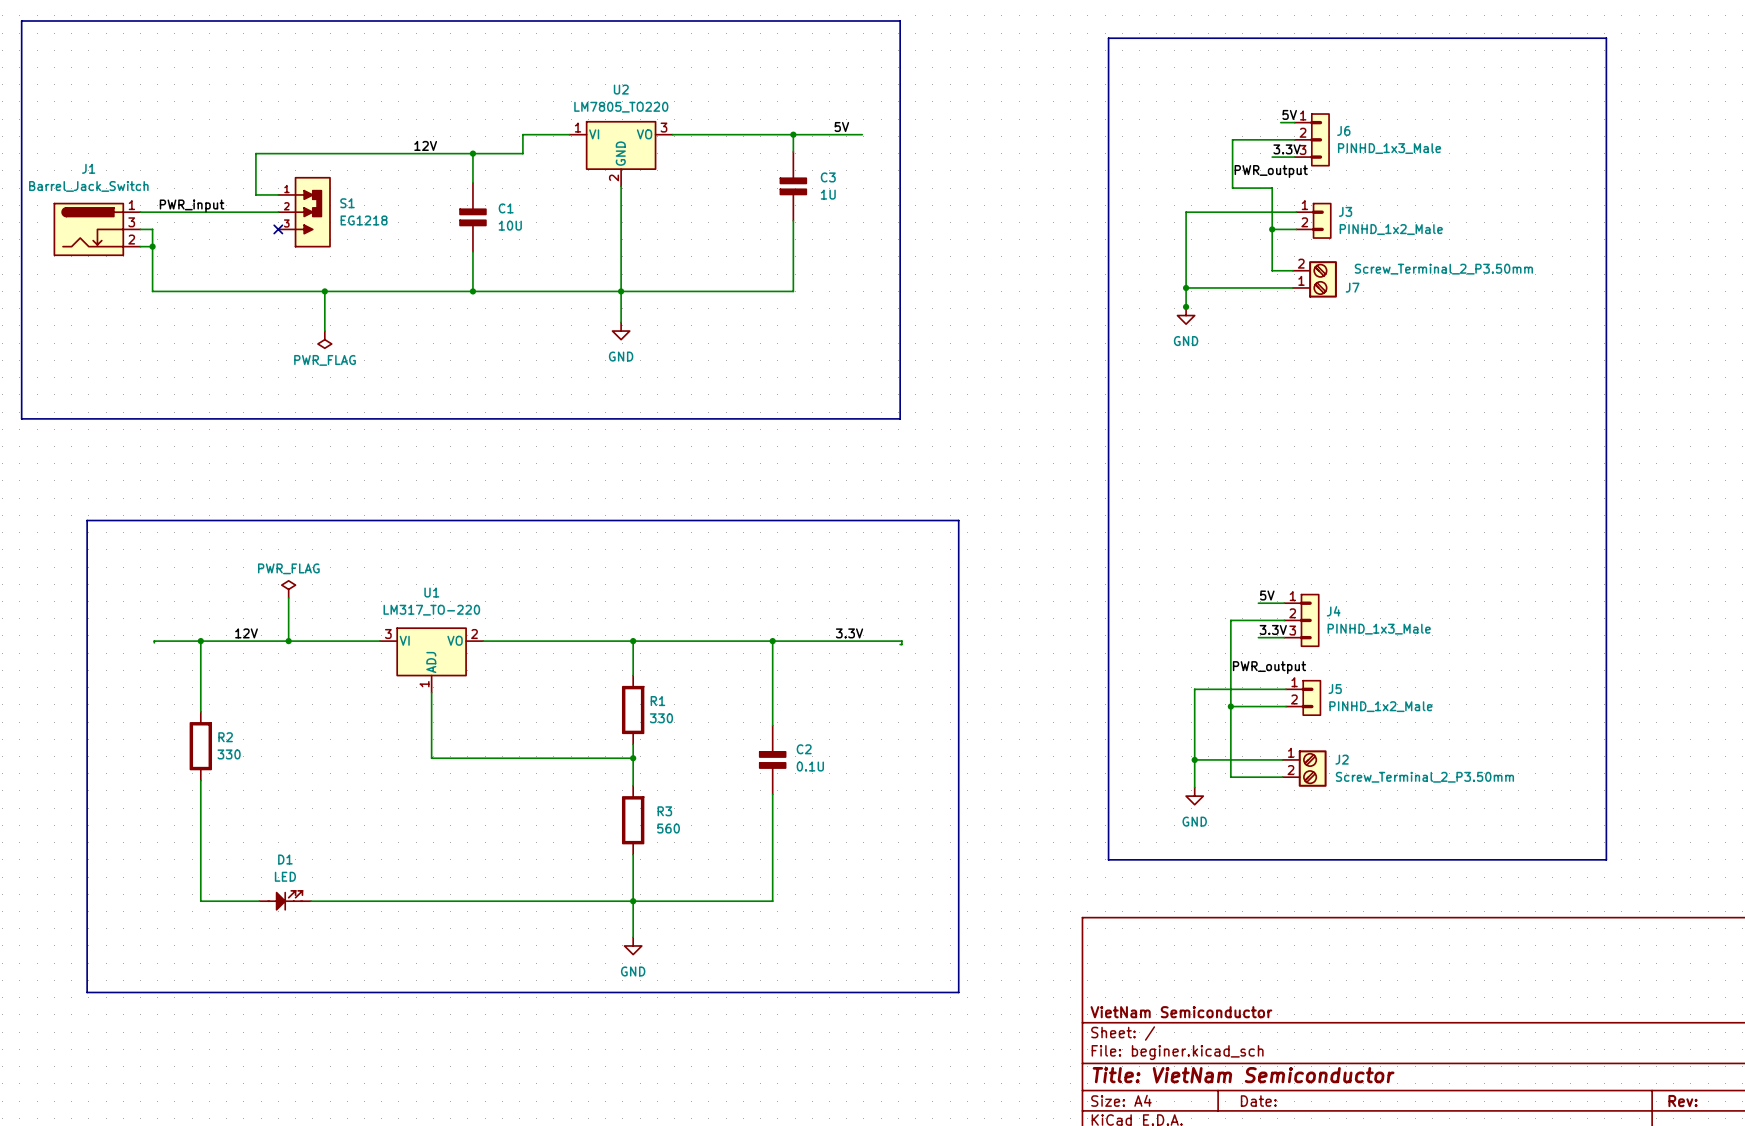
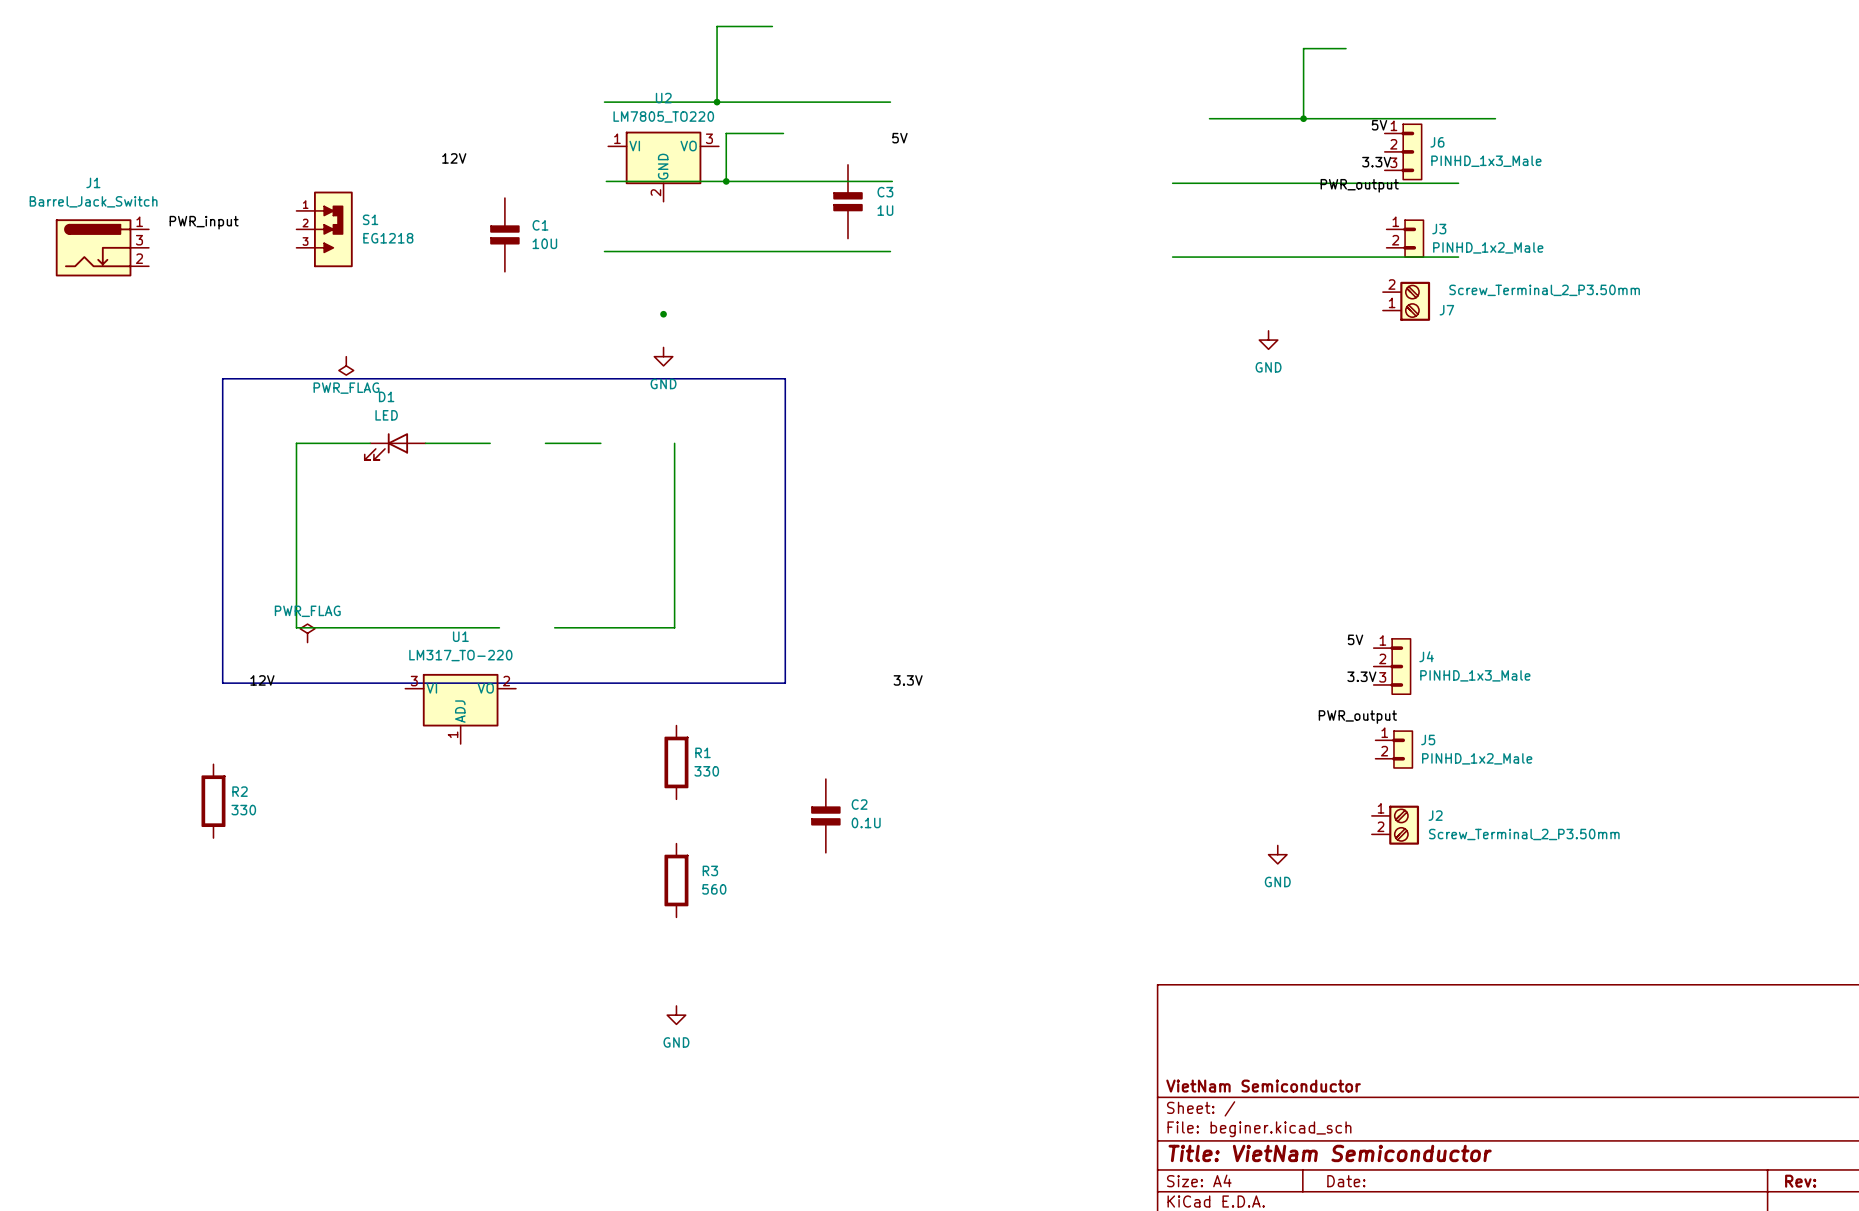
line: (21, 20) (900, 20) (900, 418) (21, 418) (21, 20) -> none
wire: none -> (772, 26) (717, 26) (717, 102)
line: (1108, 38) (1606, 38) (1606, 859) (1108, 859) (1108, 38) -> none
wire: none -> (1346, 48) (1303, 48) (1303, 118)
wire: none -> (604, 102) (890, 102)
junction: none -> (717, 102)
wire: none -> (1209, 118) (1495, 118)
junction: none -> (1303, 118)
wire: none -> (783, 133) (726, 133) (726, 181)
wire: (1280, 122) (1294, 122) -> none
wire: (569, 134) (522, 134) (522, 153) (255, 153) (255, 194) (278, 194) -> none
wire: (672, 134) (862, 134) -> none
wire: (793, 134) (793, 151) -> none
junction: (793, 134) -> none
wire: (1294, 139) (1232, 139) (1232, 188) (1272, 188) (1272, 270) (1292, 270) -> none
wire: (472, 153) (472, 182) -> none
junction: (472, 153) -> none
wire: (1272, 157) (1294, 157) -> none
wire: none -> (606, 181) (892, 181)
junction: none -> (726, 181)
wire: none -> (1172, 183) (1458, 183)
wire: (621, 186) (621, 322) -> none
wire: (140, 212) (278, 212) -> none
wire: (1296, 212) (1186, 212) (1186, 308) -> none
wire: (793, 220) (793, 291) (152, 291) (152, 229) (140, 229) -> none
no-connect mark: (278, 229) -> none
wire: (1272, 229) (1296, 229) -> none
junction: (1272, 229) -> none
wire: none -> (604, 251) (890, 251)
wire: none -> (1172, 257) (1458, 257)
wire: (140, 246) (152, 246) -> none
junction: (152, 246) -> none
wire: (472, 251) (472, 291) -> none
wire: (1186, 287) (1292, 287) -> none
junction: (1186, 287) -> none
wire: (324, 291) (324, 331) -> none
junction: (324, 291) -> none
junction: (472, 291) -> none
junction: (1186, 306) -> none
line: none -> (222, 378) (785, 378) (785, 683) (222, 683) (222, 378)
wire: none -> (370, 443) (296, 443) (296, 627) (499, 627)
wire: none -> (425, 443) (490, 443)
wire: none -> (545, 443) (600, 443)
wire: none -> (674, 443) (674, 627) (554, 627)
line: (87, 520) (958, 520) (958, 992) (87, 992) (87, 520) -> none
wire: (288, 598) (288, 641) -> none
wire: (1258, 603) (1284, 603) -> none
wire: (1284, 620) (1230, 620) (1230, 777) (1282, 777) -> none
wire: (1258, 637) (1284, 637) -> none
wire: (200, 641) (200, 711) -> none
junction: (200, 641) -> none
junction: (288, 641) -> none
wire: (379, 641) (154, 641) (154, 642) -> none
wire: (483, 641) (901, 641) (901, 644) (900, 644) -> none
wire: (633, 641) (633, 675) -> none
junction: (633, 641) -> none
wire: (772, 641) (772, 725) -> none
junction: (772, 641) -> none
wire: (1285, 689) (1194, 689) (1194, 787) -> none
wire: (431, 692) (431, 758) (633, 758) -> none
wire: (1230, 706) (1285, 706) -> none
junction: (1230, 706) -> none
wire: (633, 744) (633, 785) -> none
junction: (633, 758) -> none
wire: (1194, 759) (1282, 759) -> none
junction: (1194, 759) -> none
wire: (200, 780) (200, 901) (259, 901) -> none
wire: (772, 794) (772, 901) (311, 901) -> none
wire: (633, 854) (633, 937) -> none
D1 symbol: [259, 890, 312, 910] -> [364, 433, 426, 460]
junction: (633, 901) -> none

